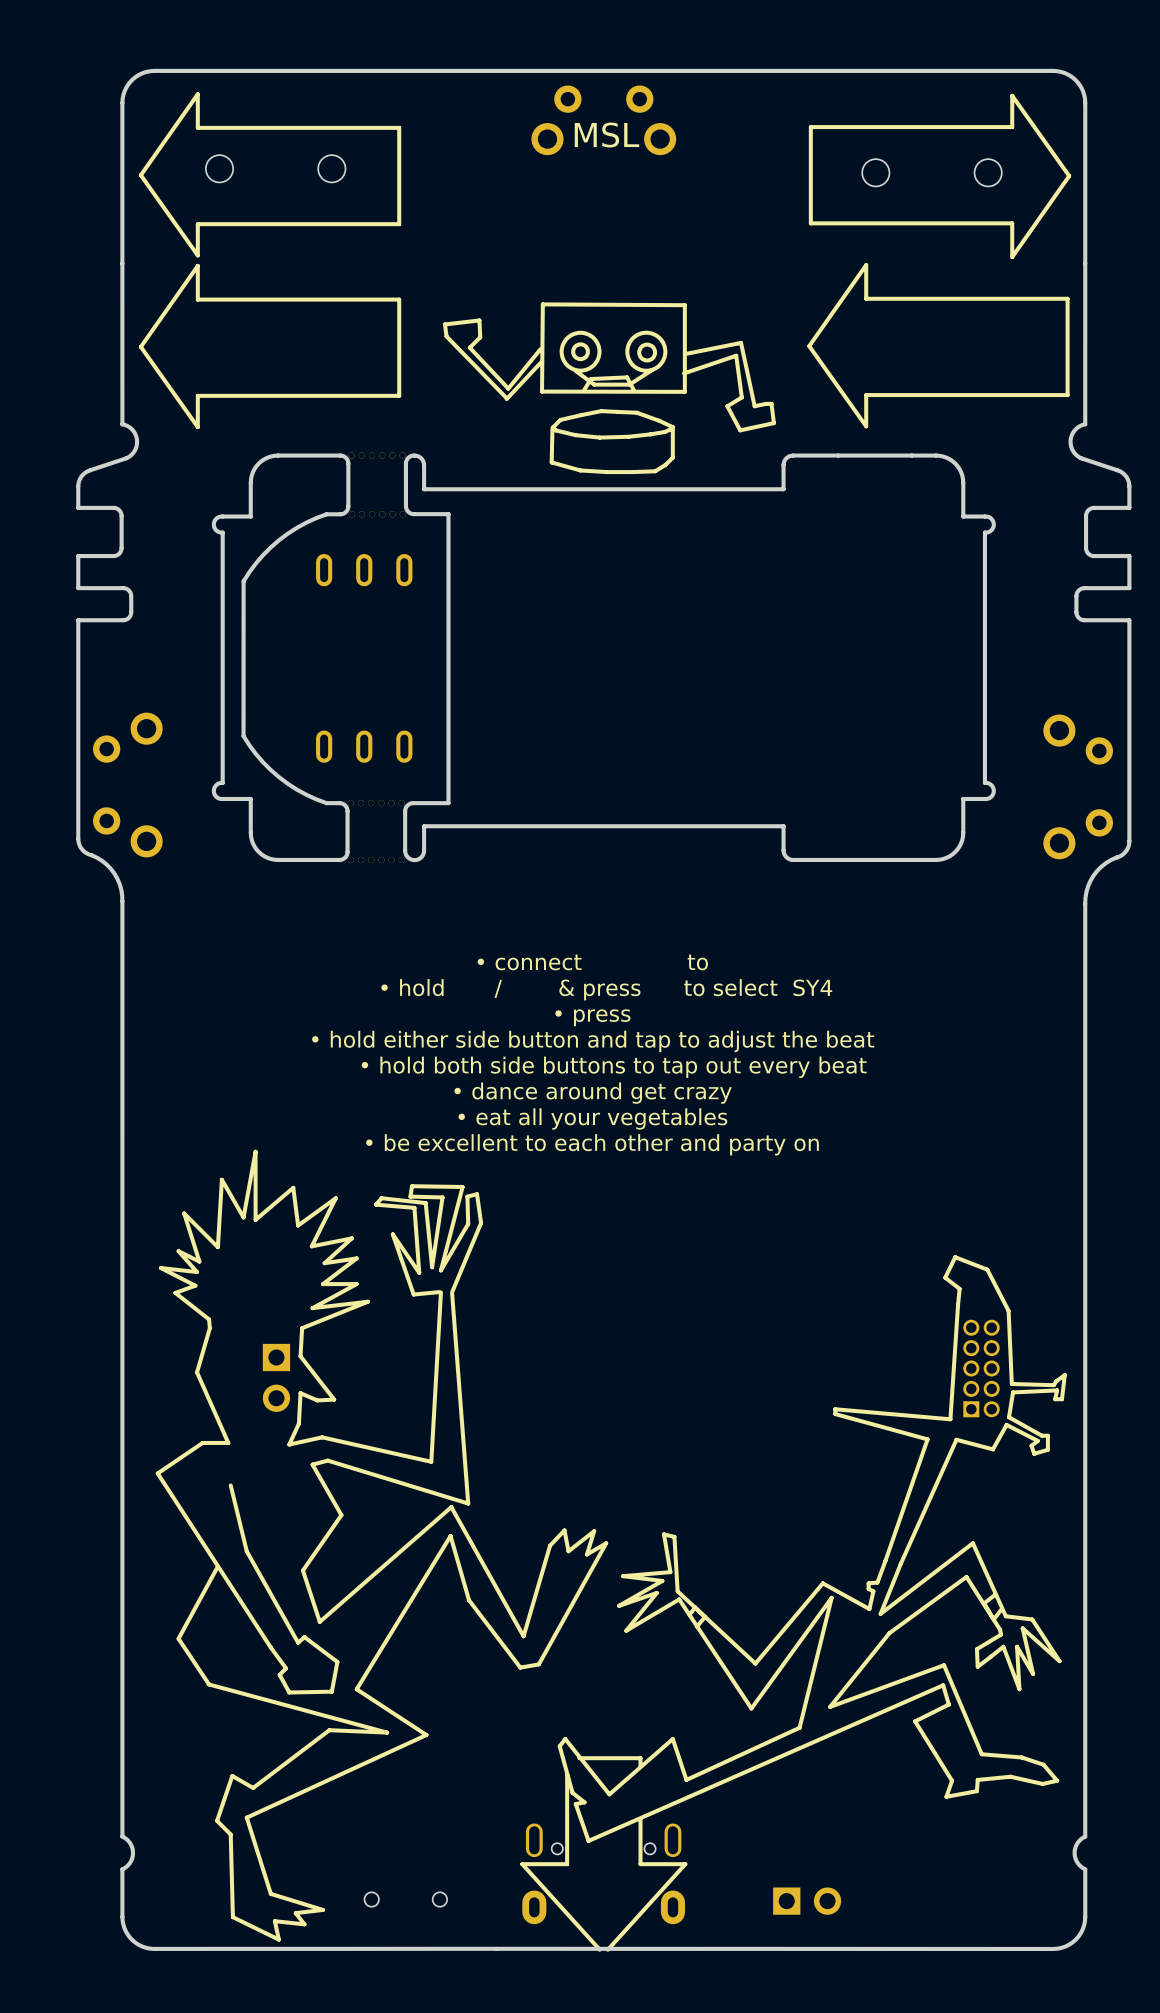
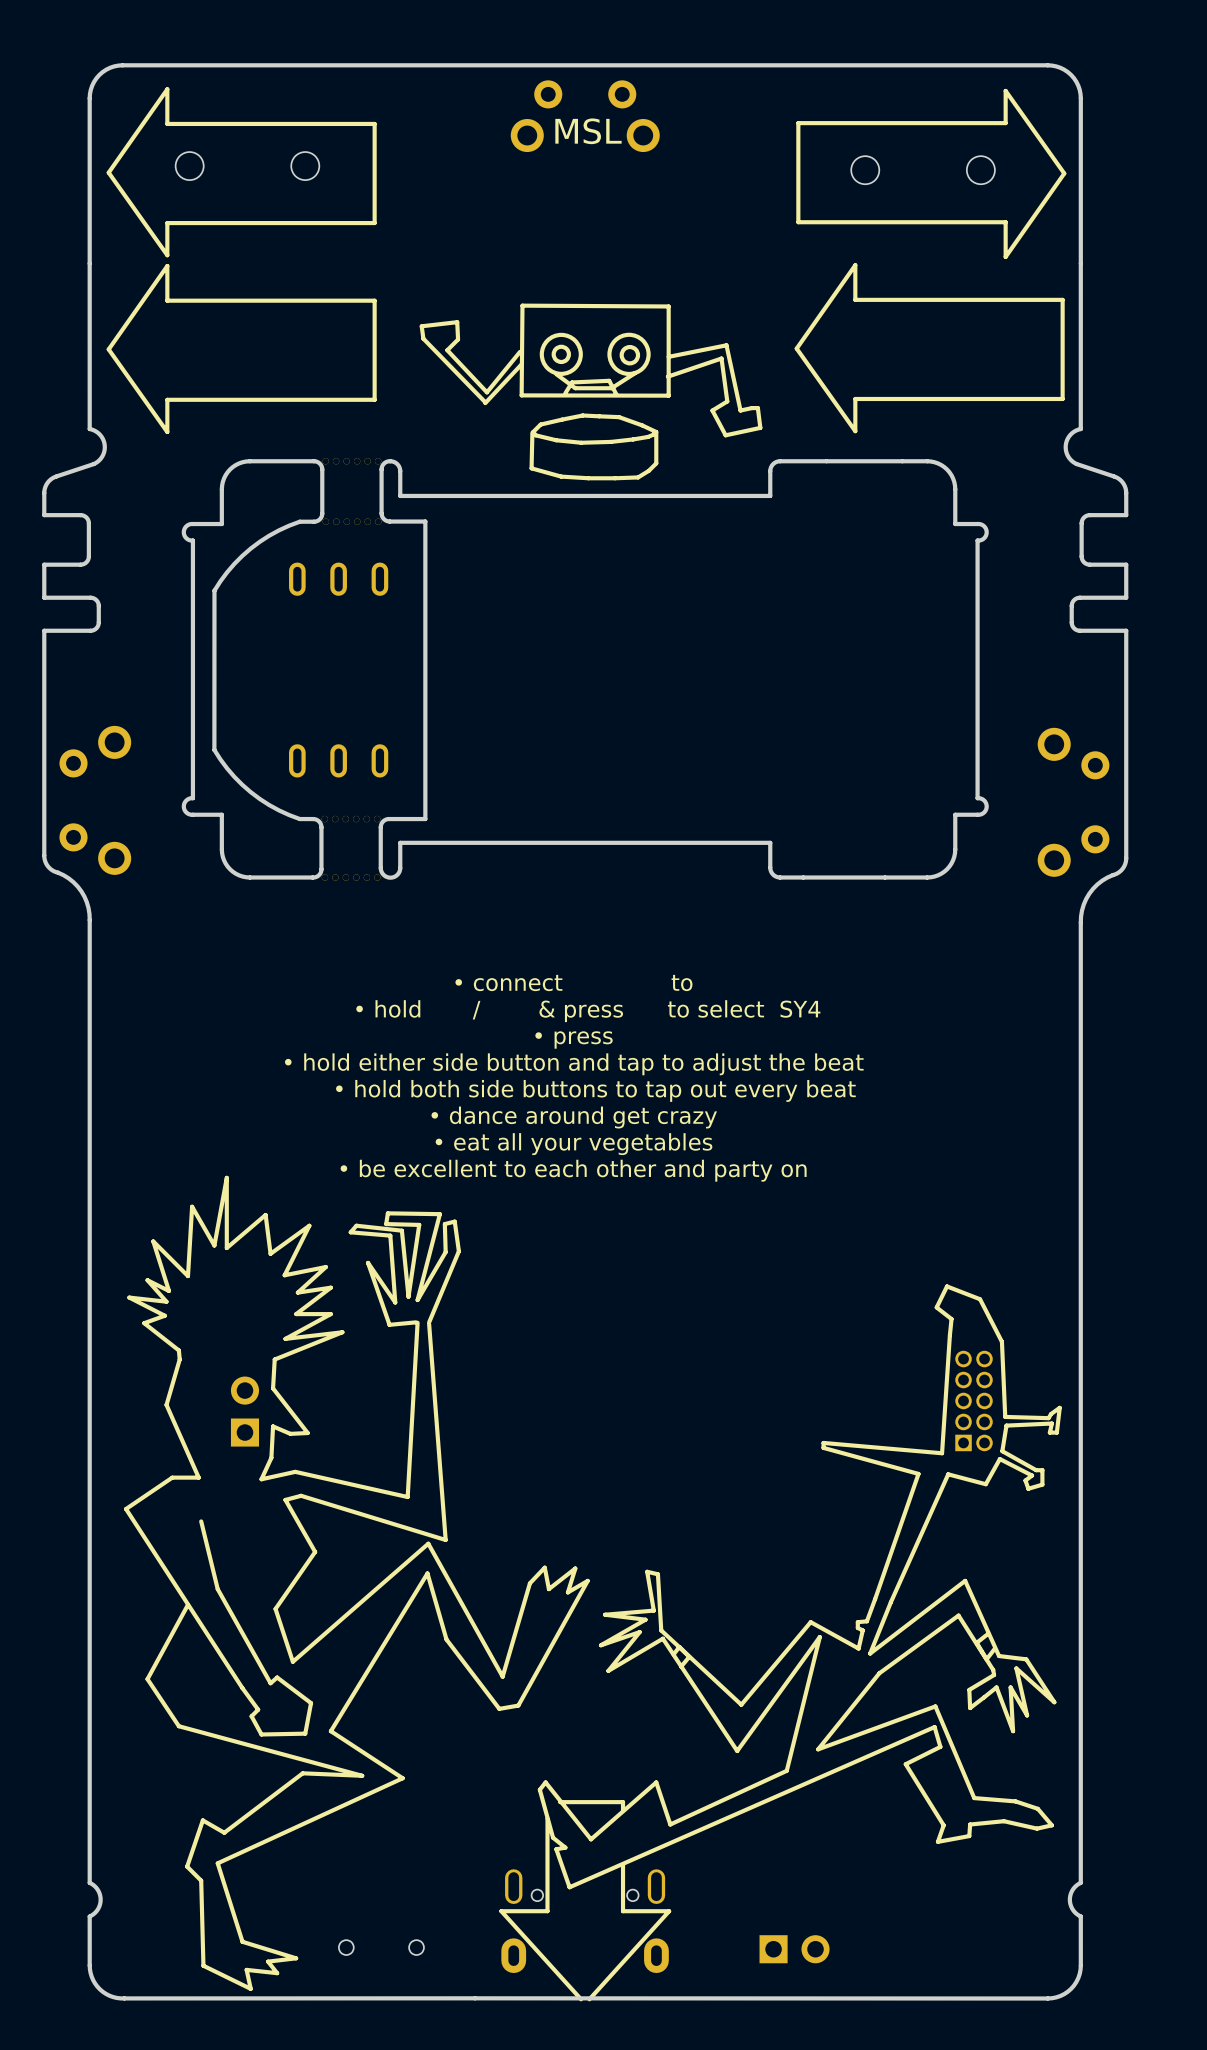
part rotation: 0° (276, 1377) -> 180° (244, 1411)

